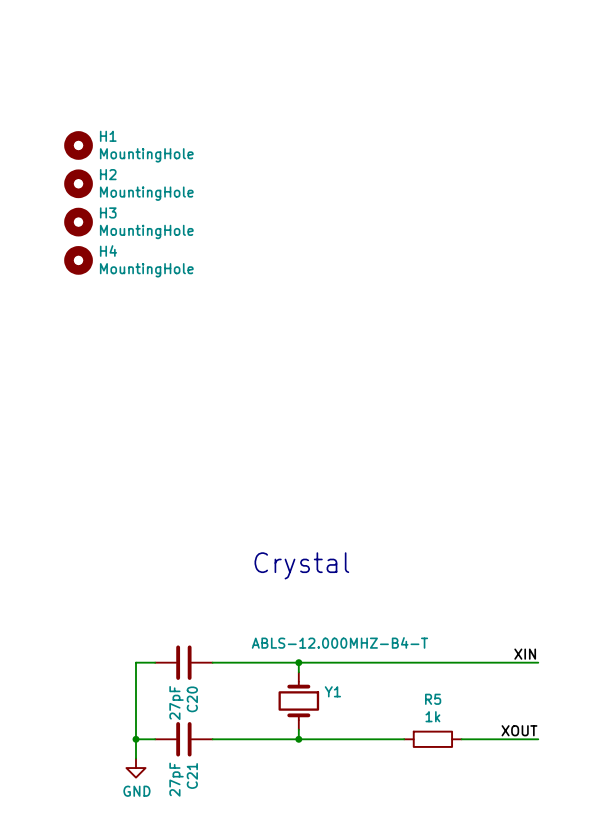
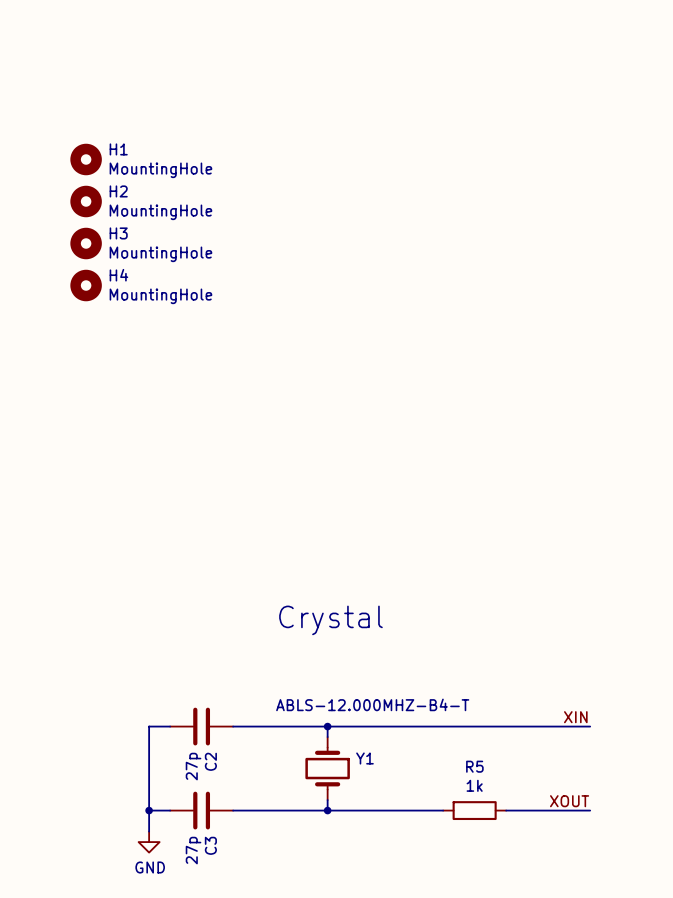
C20 name: C20 (192, 699) -> C2 (210, 761)
C20 value: 27pF (176, 703) -> 27p (193, 766)
C21 name: C21 (192, 775) -> C3 (210, 845)
C21 value: 27pF (176, 779) -> 27p (193, 850)

